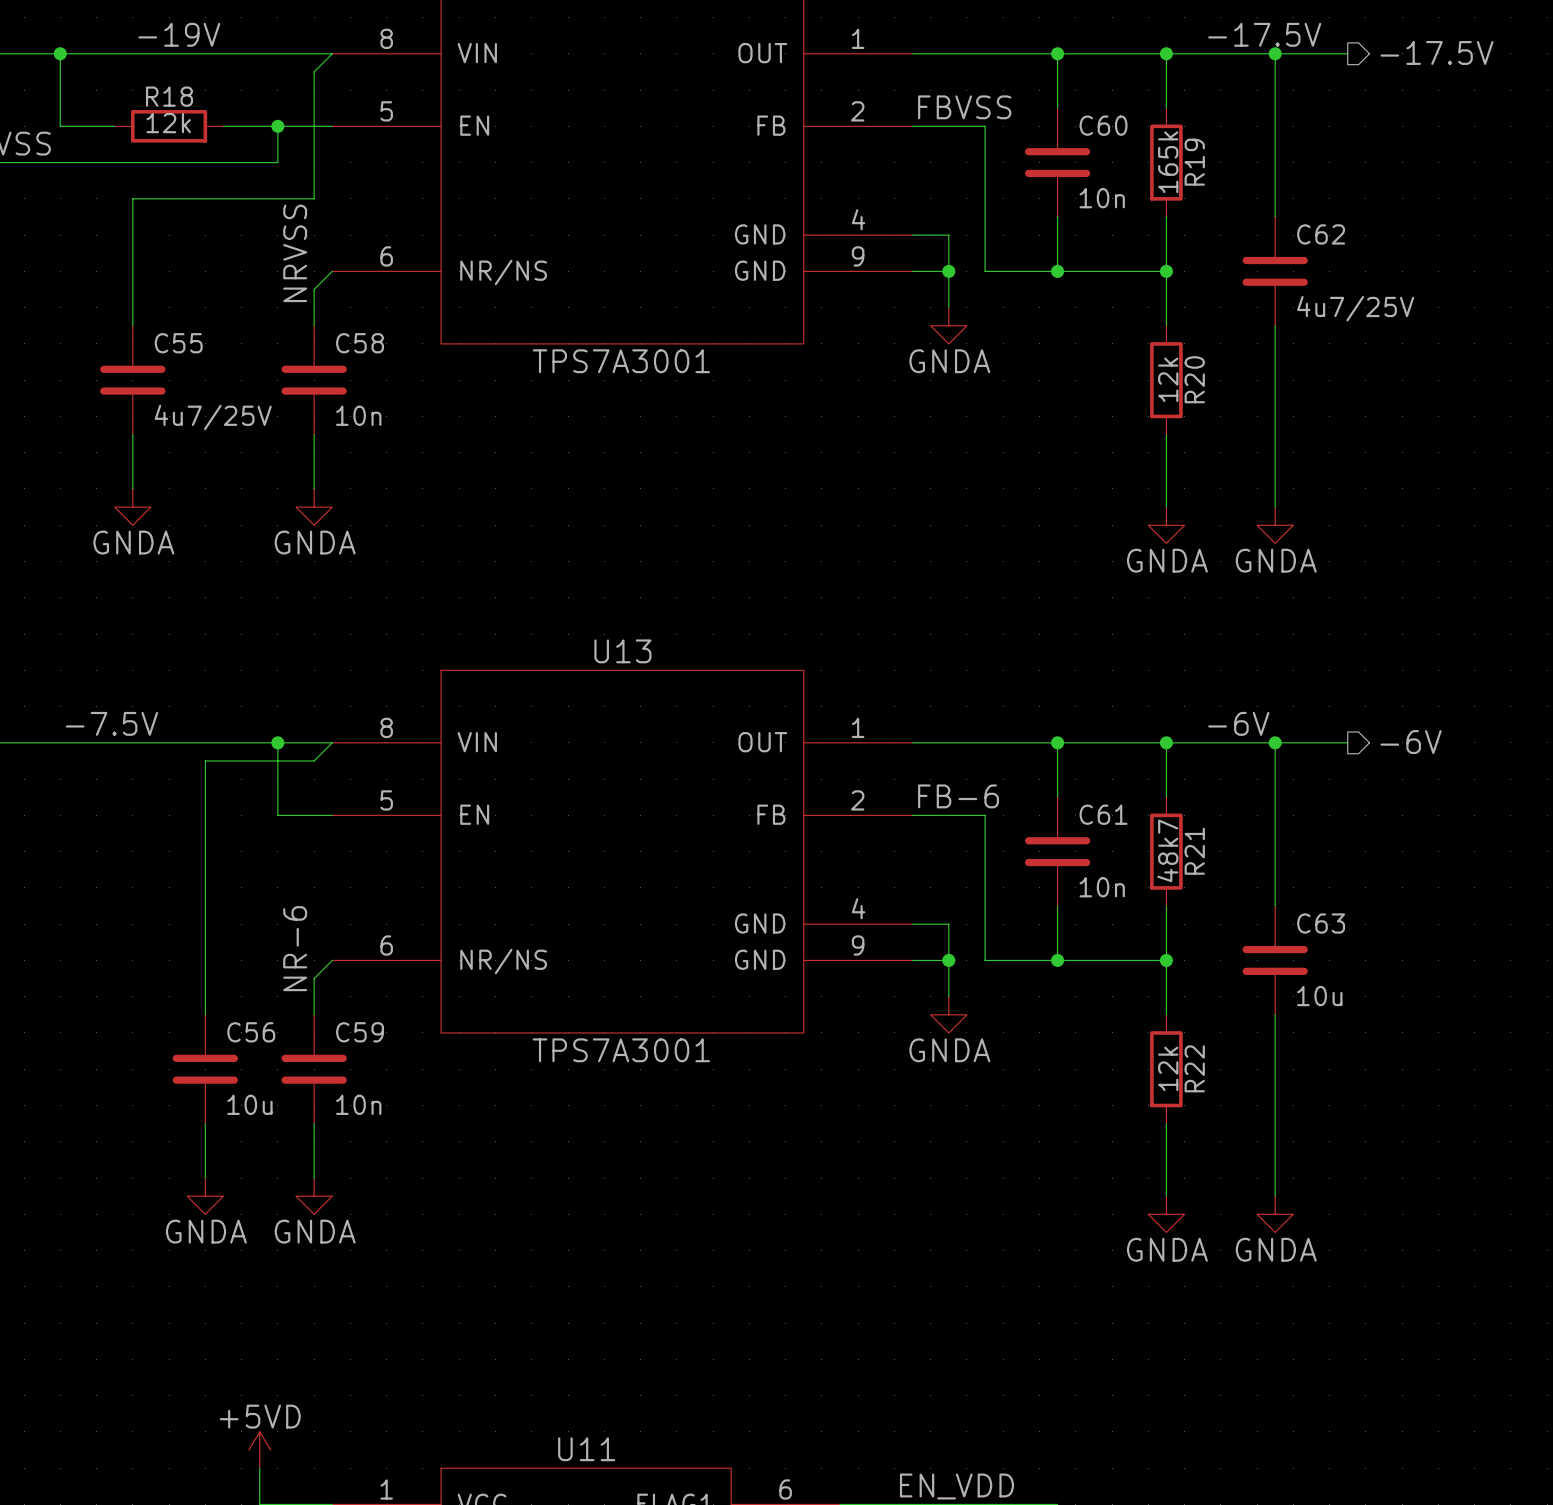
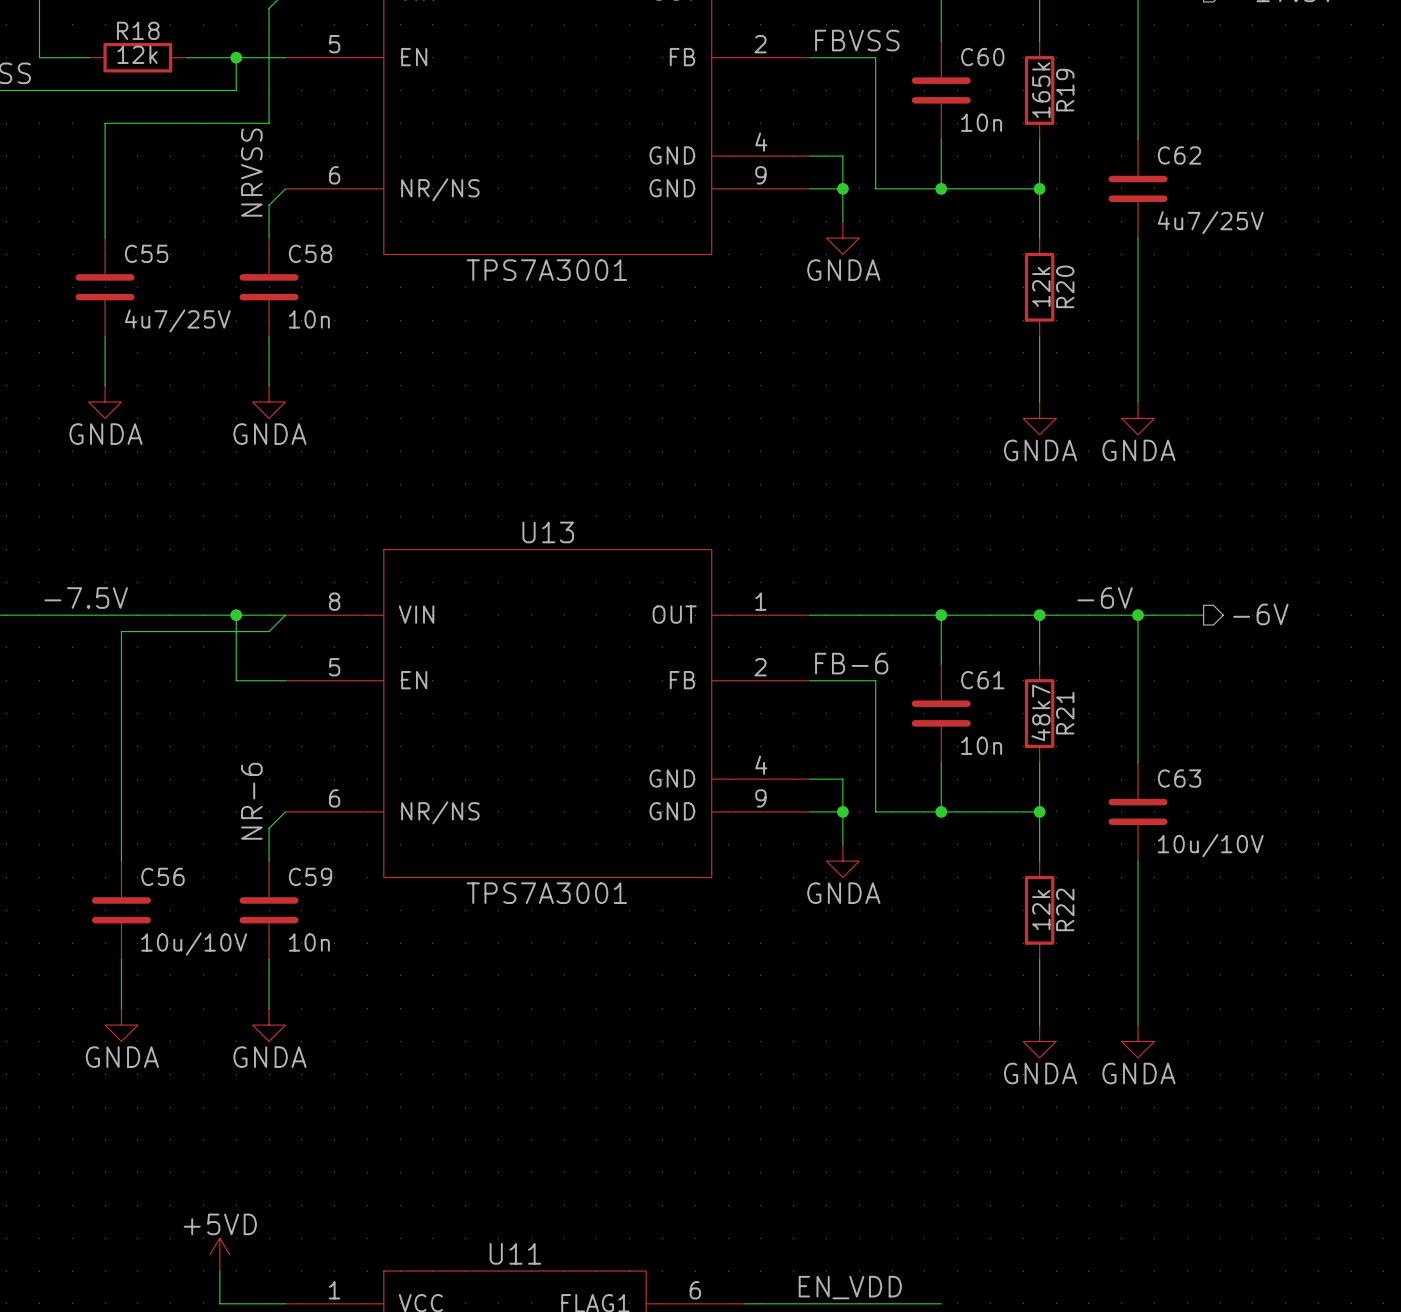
wire: (205, 760) (205, 1014) -> (170, 631) (121, 631) (121, 861)
C63 value: 10u (1319, 996) -> 10u/10V (1210, 845)
C56 position: (205, 1069) -> (121, 910)
C56 value: 10u (249, 1104) -> 10u/10V (194, 944)
wire: (205, 1123) (205, 1178) -> (121, 959) (121, 1008)
power symbol position: GNDA (205, 1196) -> GNDA (121, 1025)

